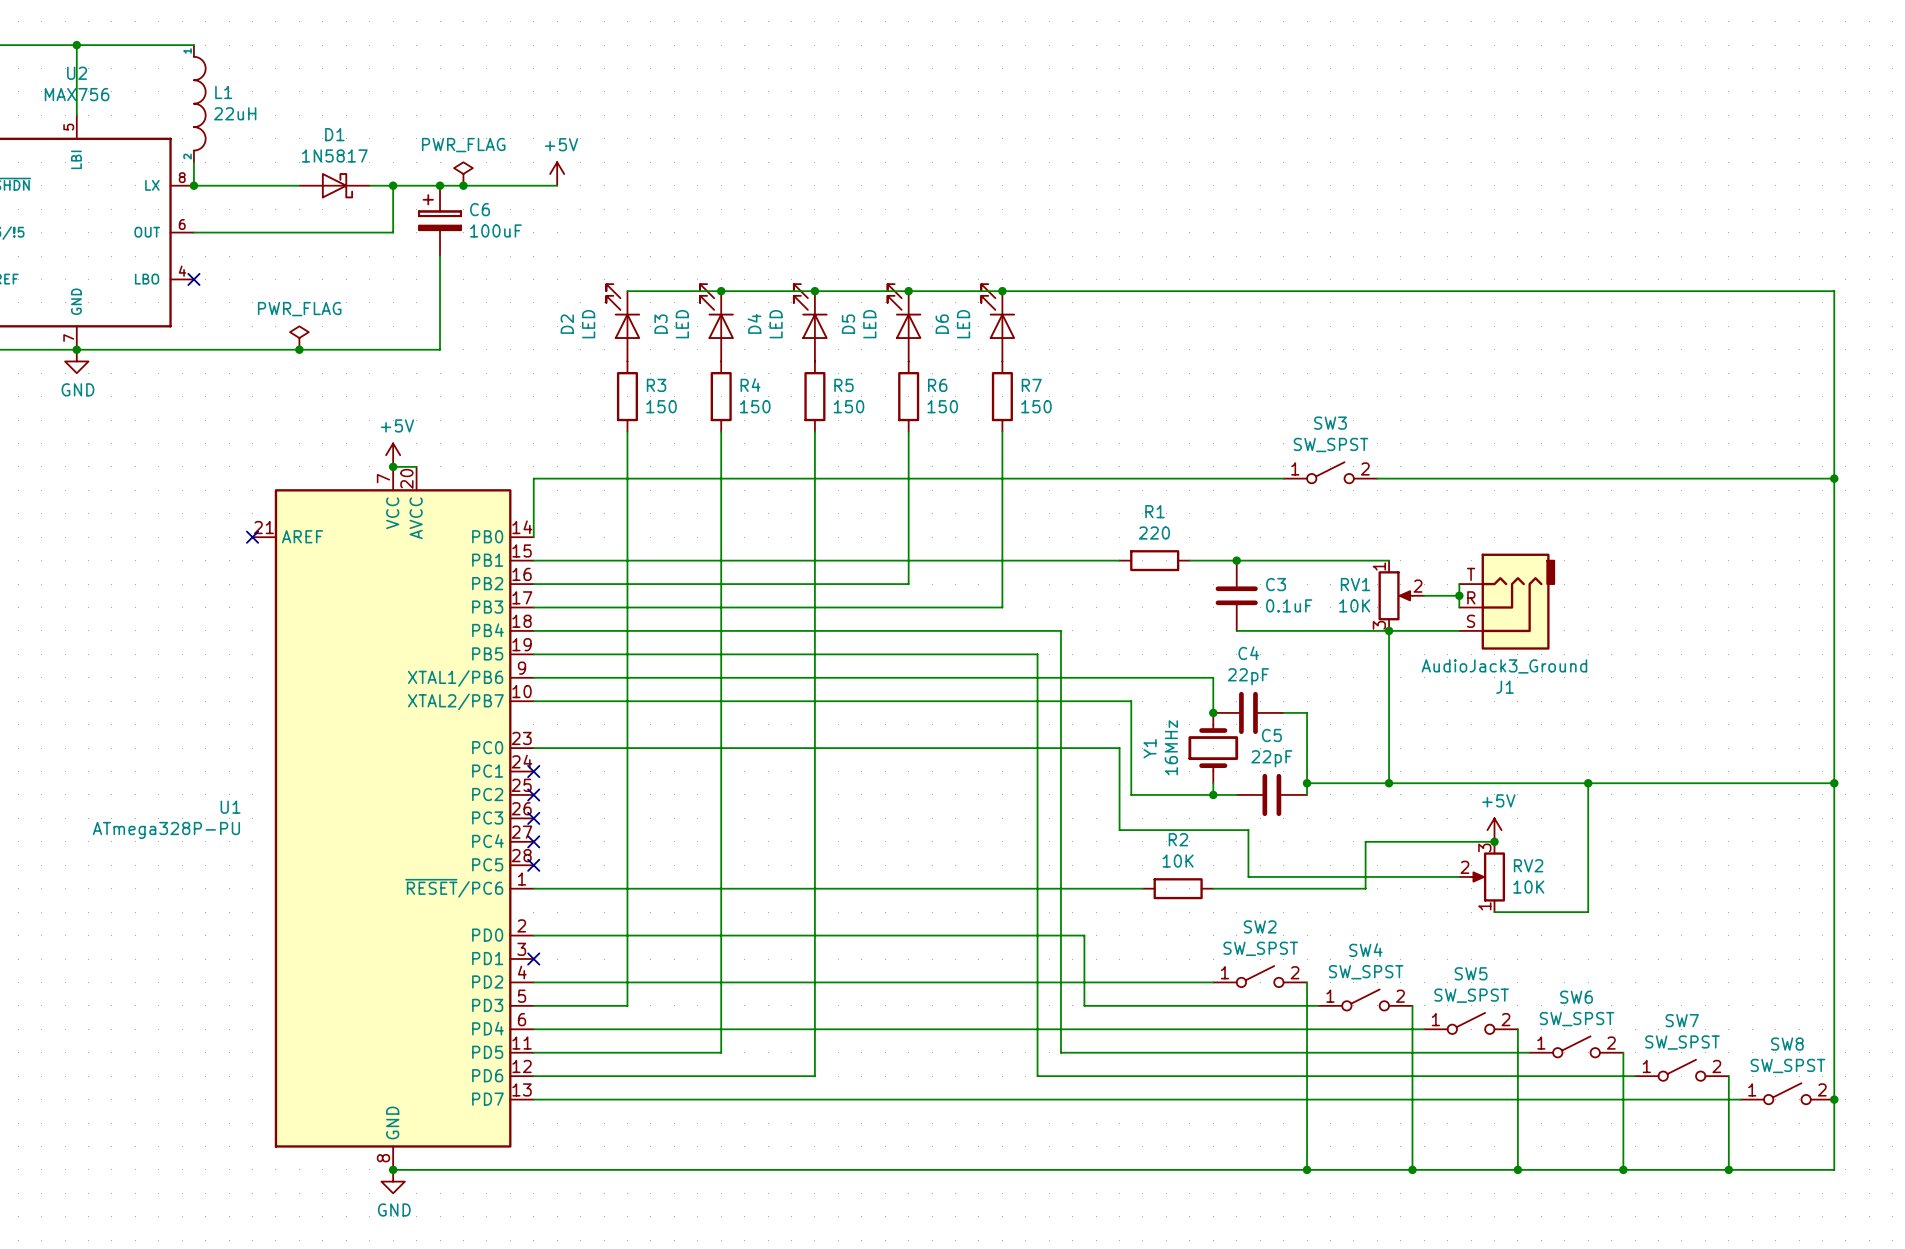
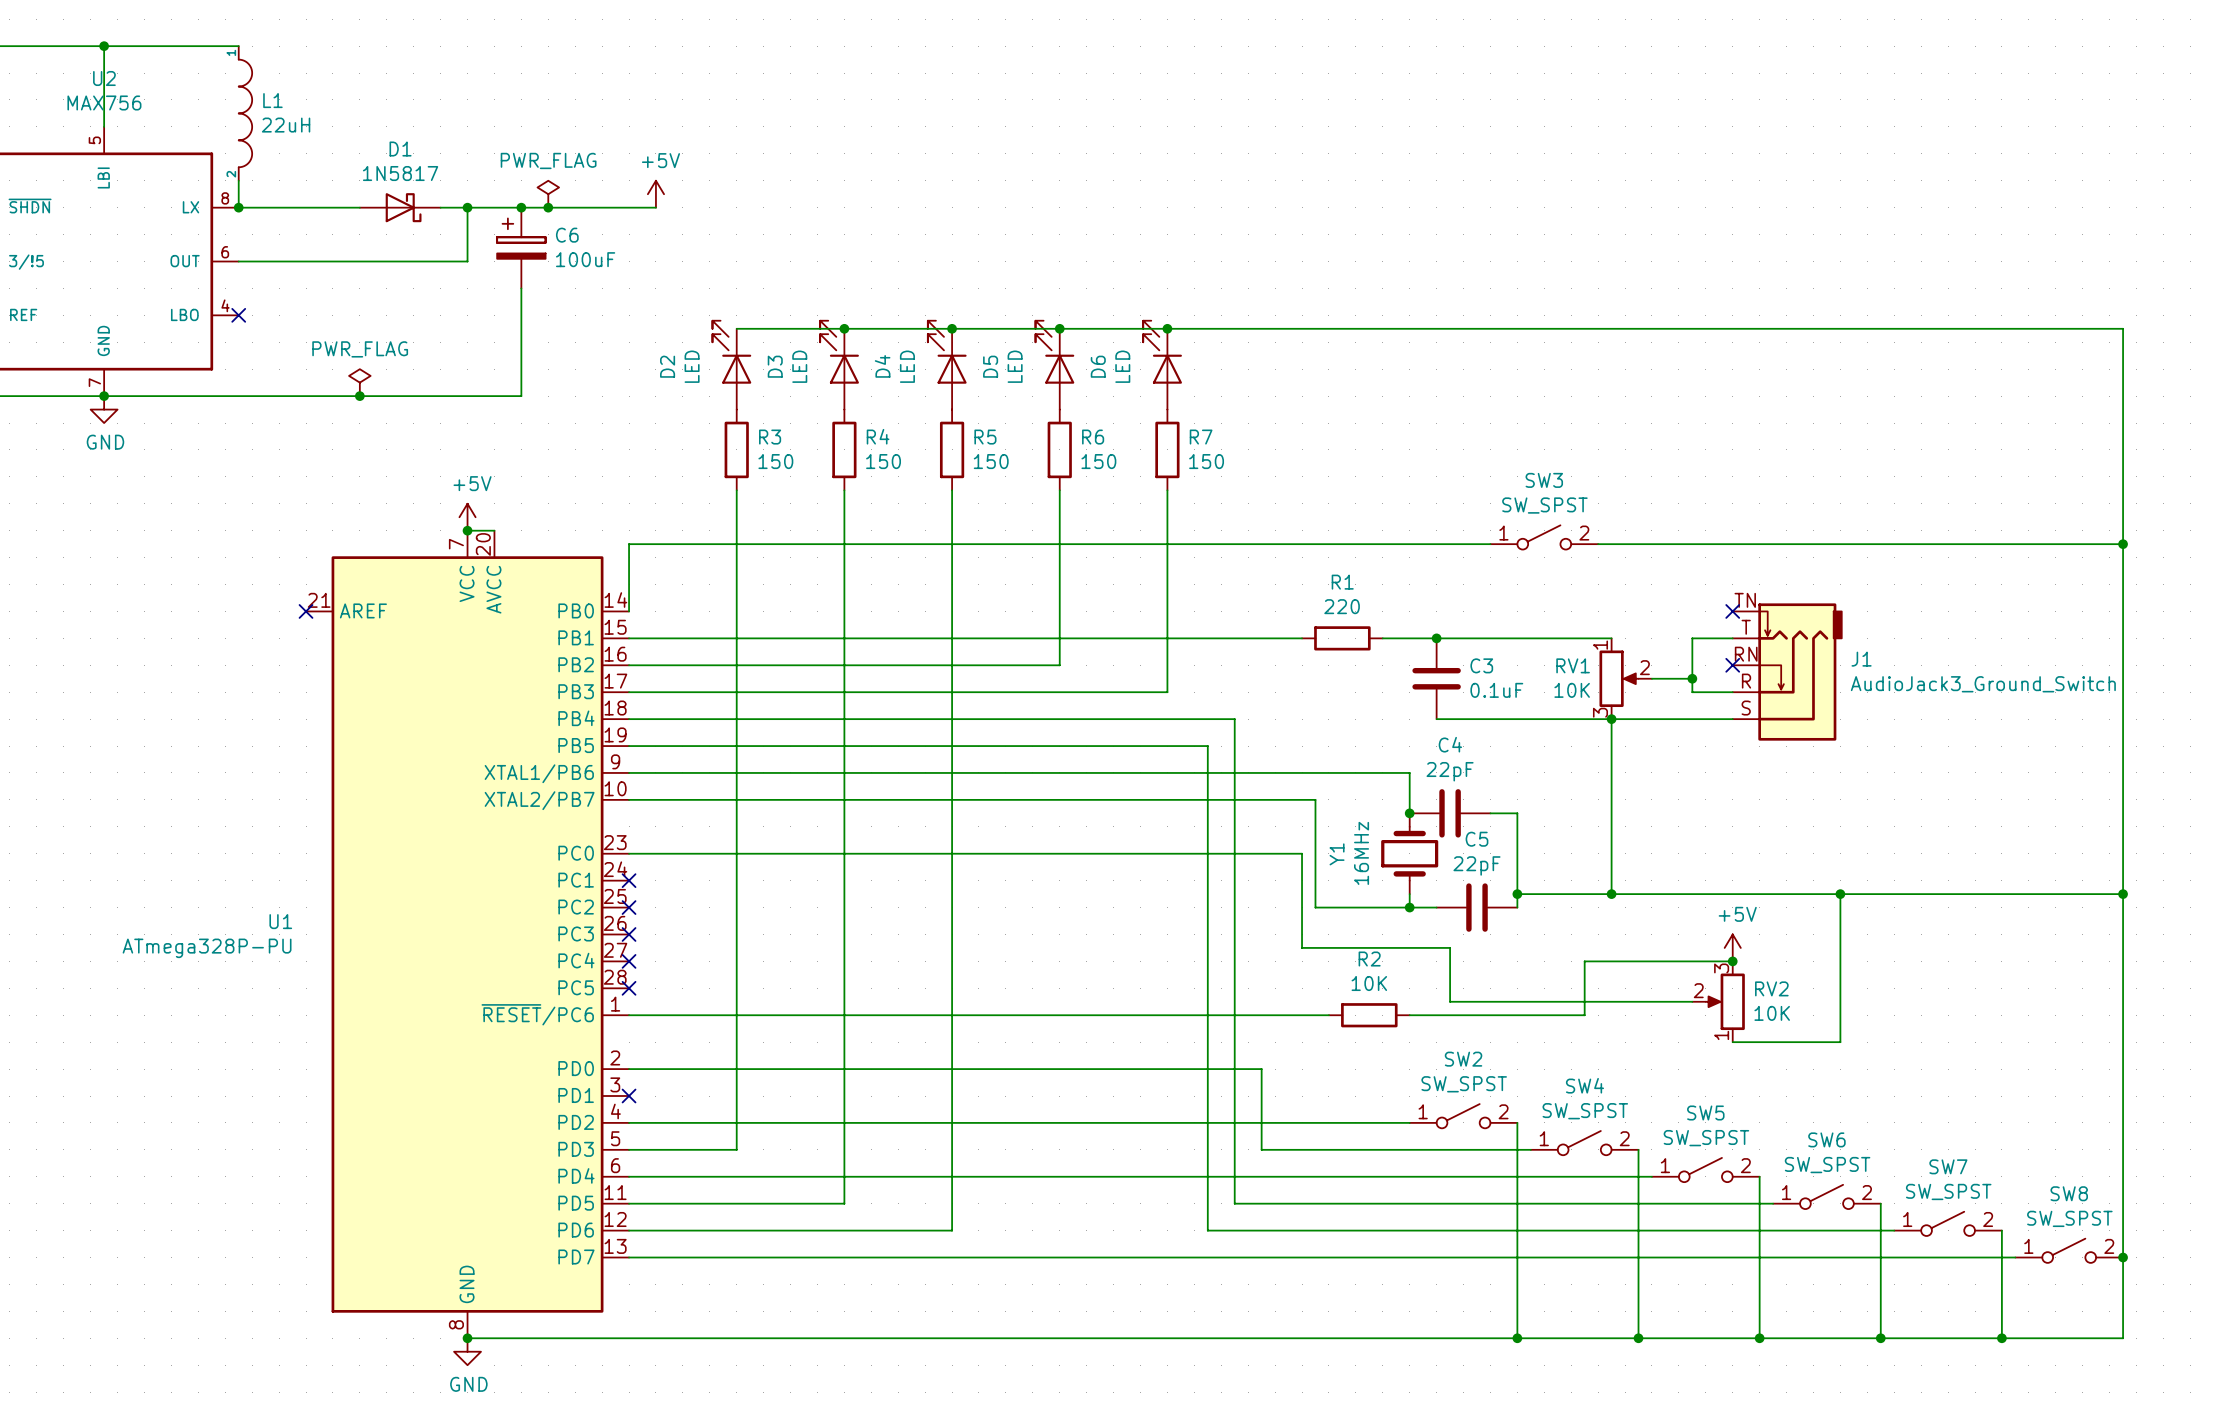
no-connect mark: none -> (1732, 611)
J1 symbol: [1459, 553, 1555, 650] -> [1732, 603, 1842, 741]
wire: none -> (1732, 638) (1692, 638) (1692, 665)
no-connect mark: none -> (1732, 665)
J1 value: AudioJack3_Ground (1504, 666) -> AudioJack3_Ground_Switch (1983, 684)
J1 name position: J1 (1504, 687) -> J1 (1861, 659)

